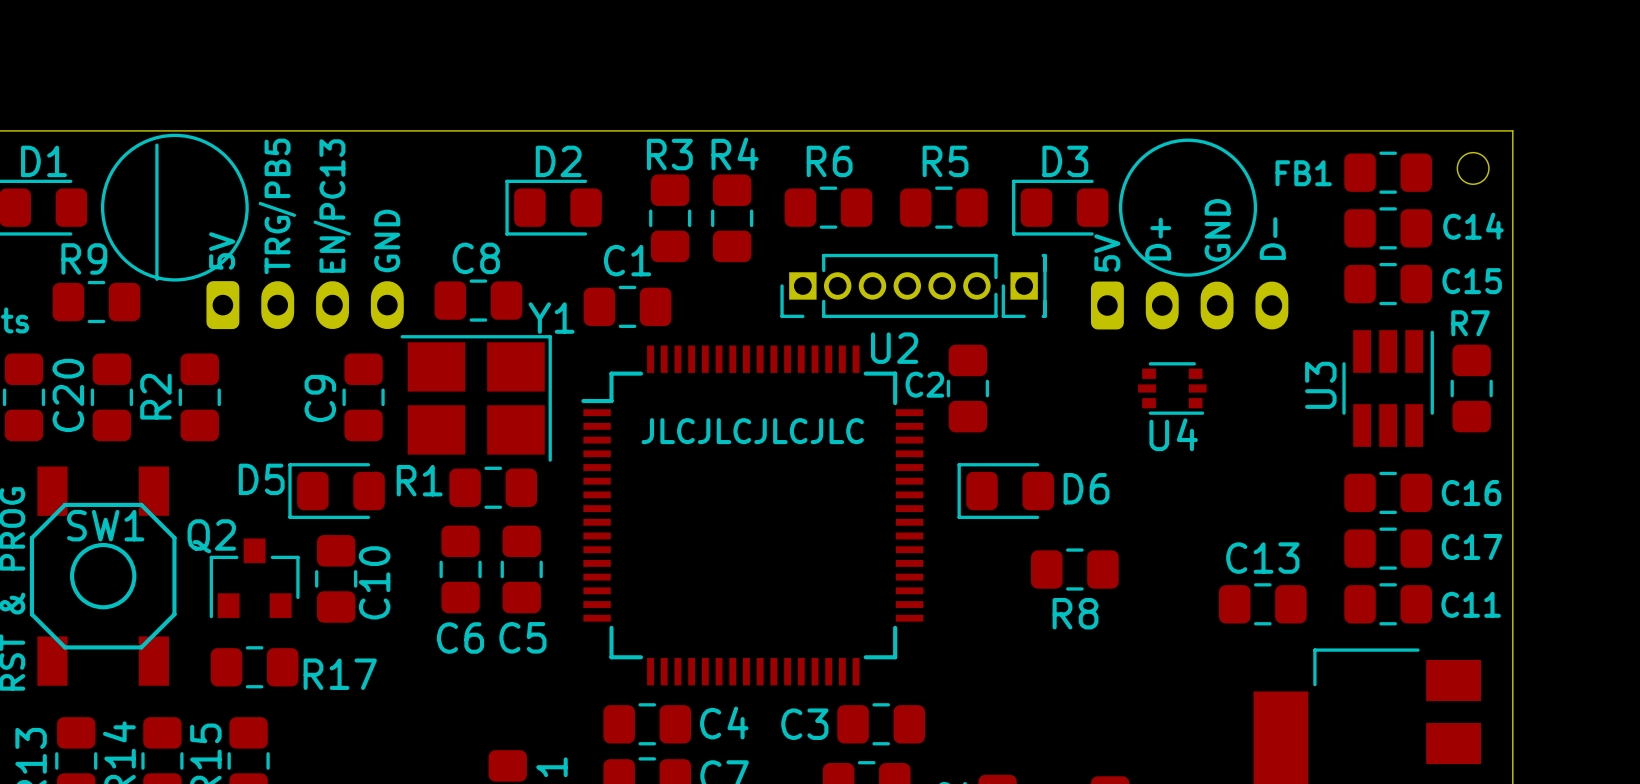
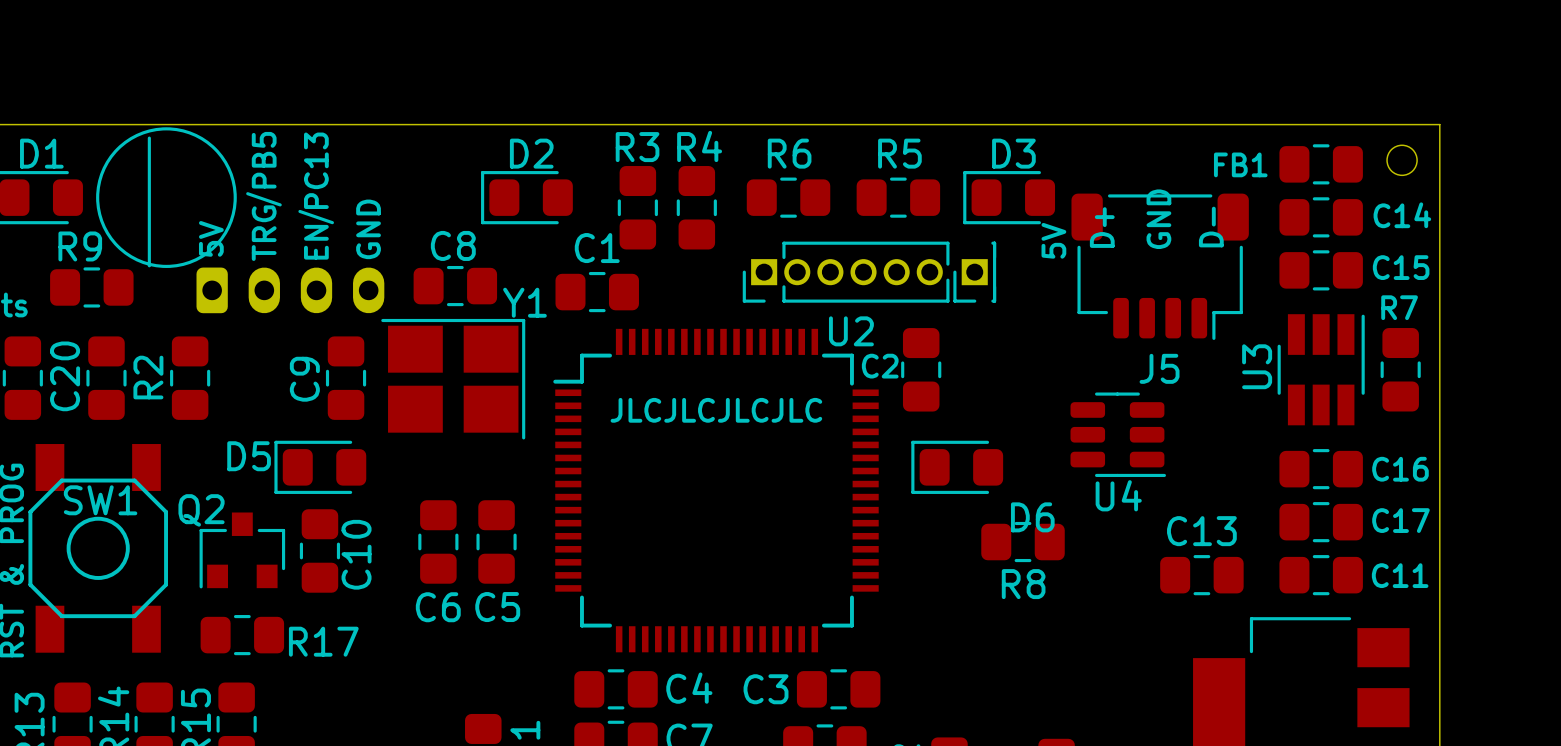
drawing: [1118, 138, 1258, 277] -> none
J5: none -> (1160, 266)
part: (1189, 305) -> none
U4 footprint: [1138, 362, 1207, 415] -> [1070, 392, 1166, 478]
R1: (493, 487) -> none
D6 name position: D6 (1086, 488) -> D6 (1032, 517)

